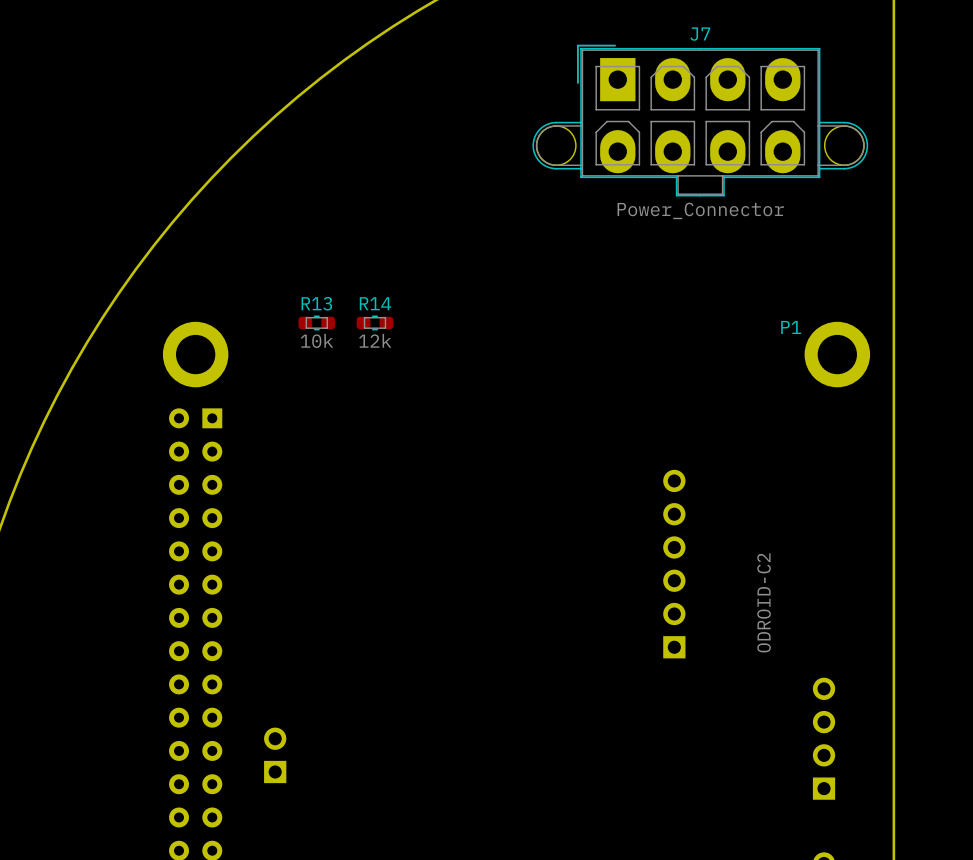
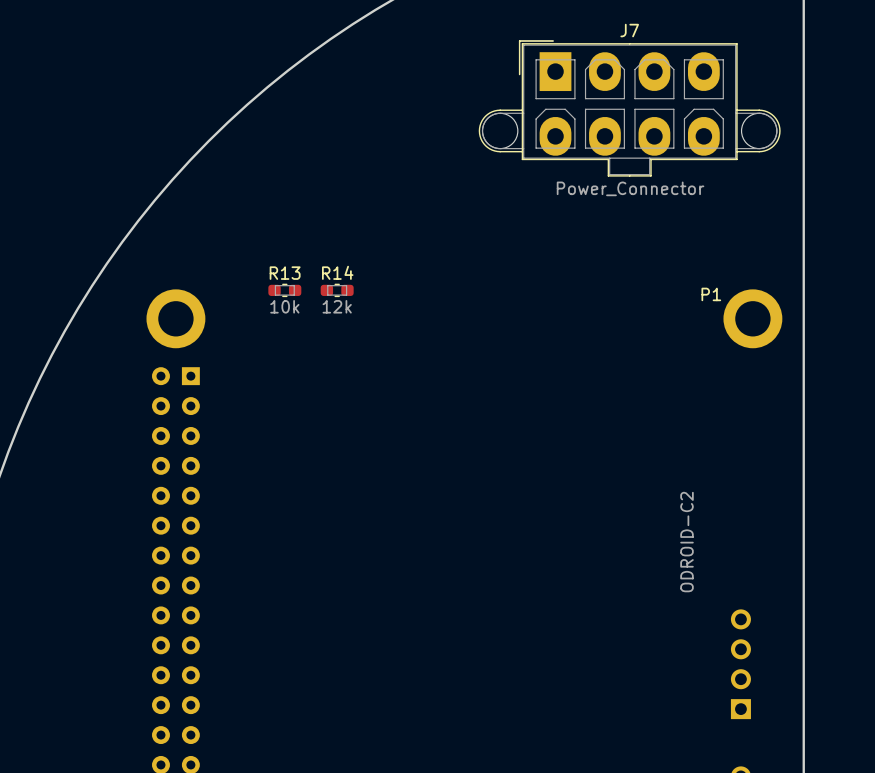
part: (674, 564) -> none
part: (275, 755) -> none

